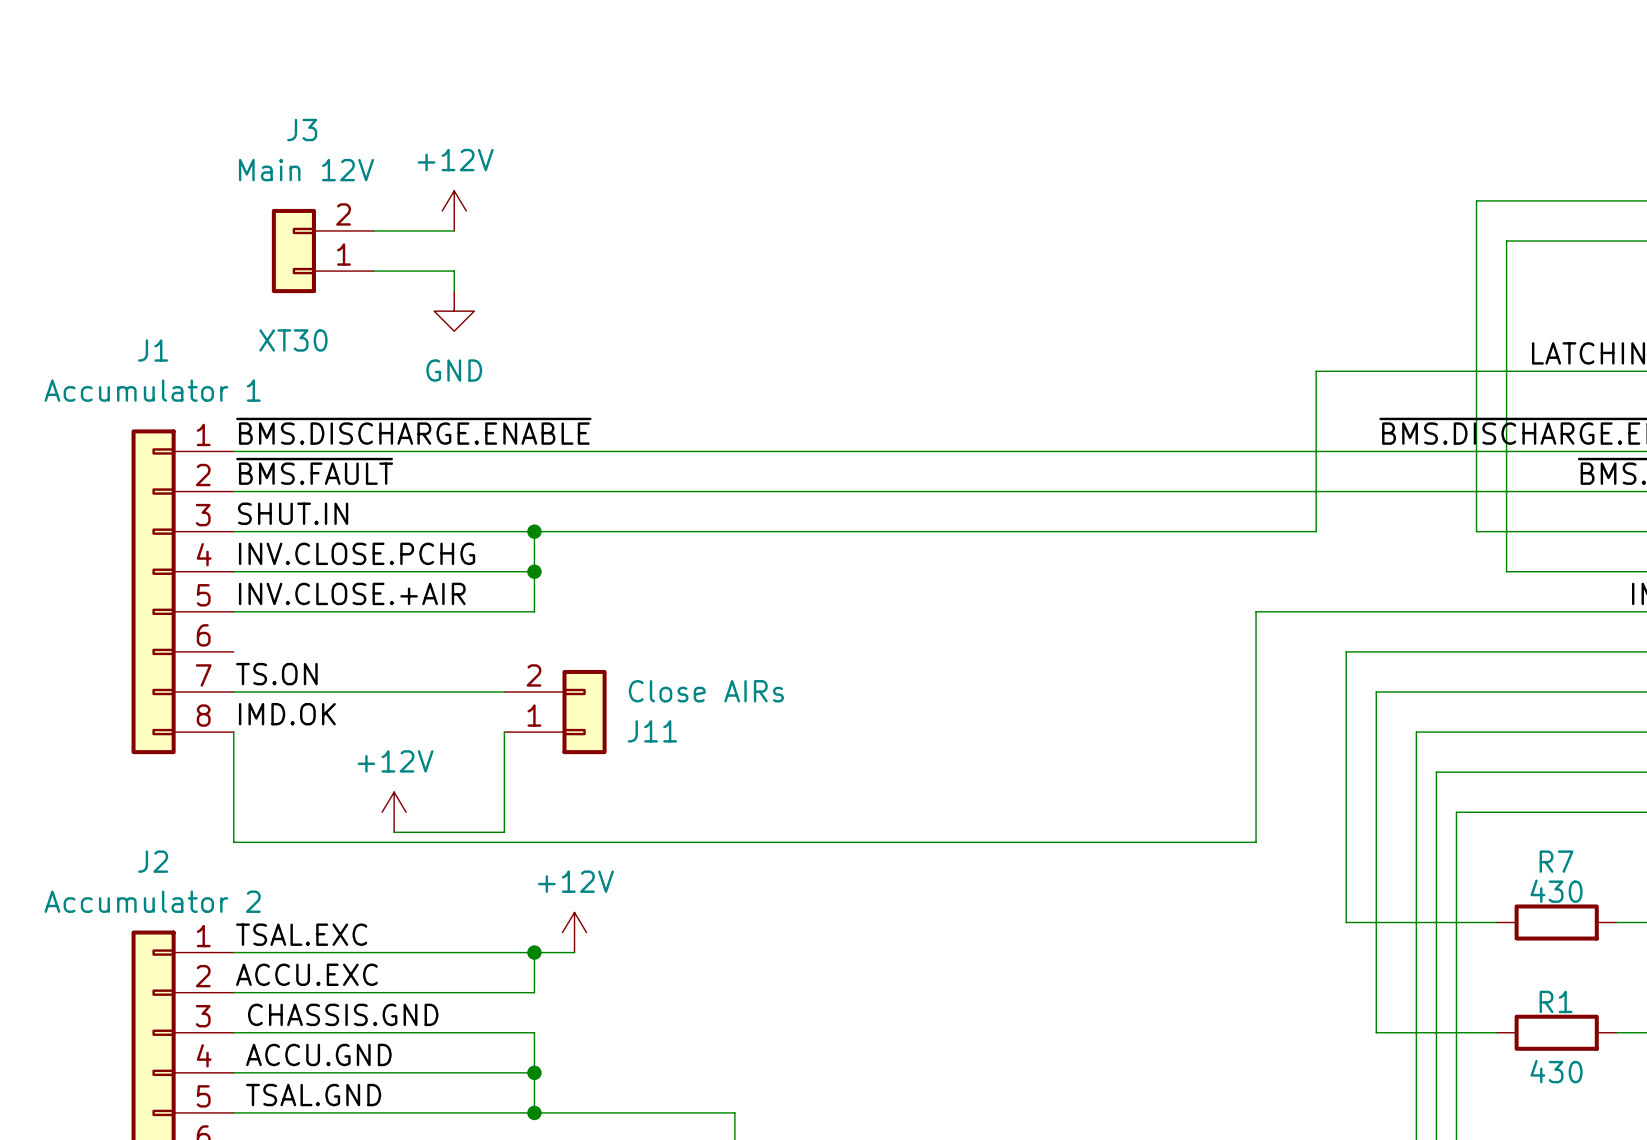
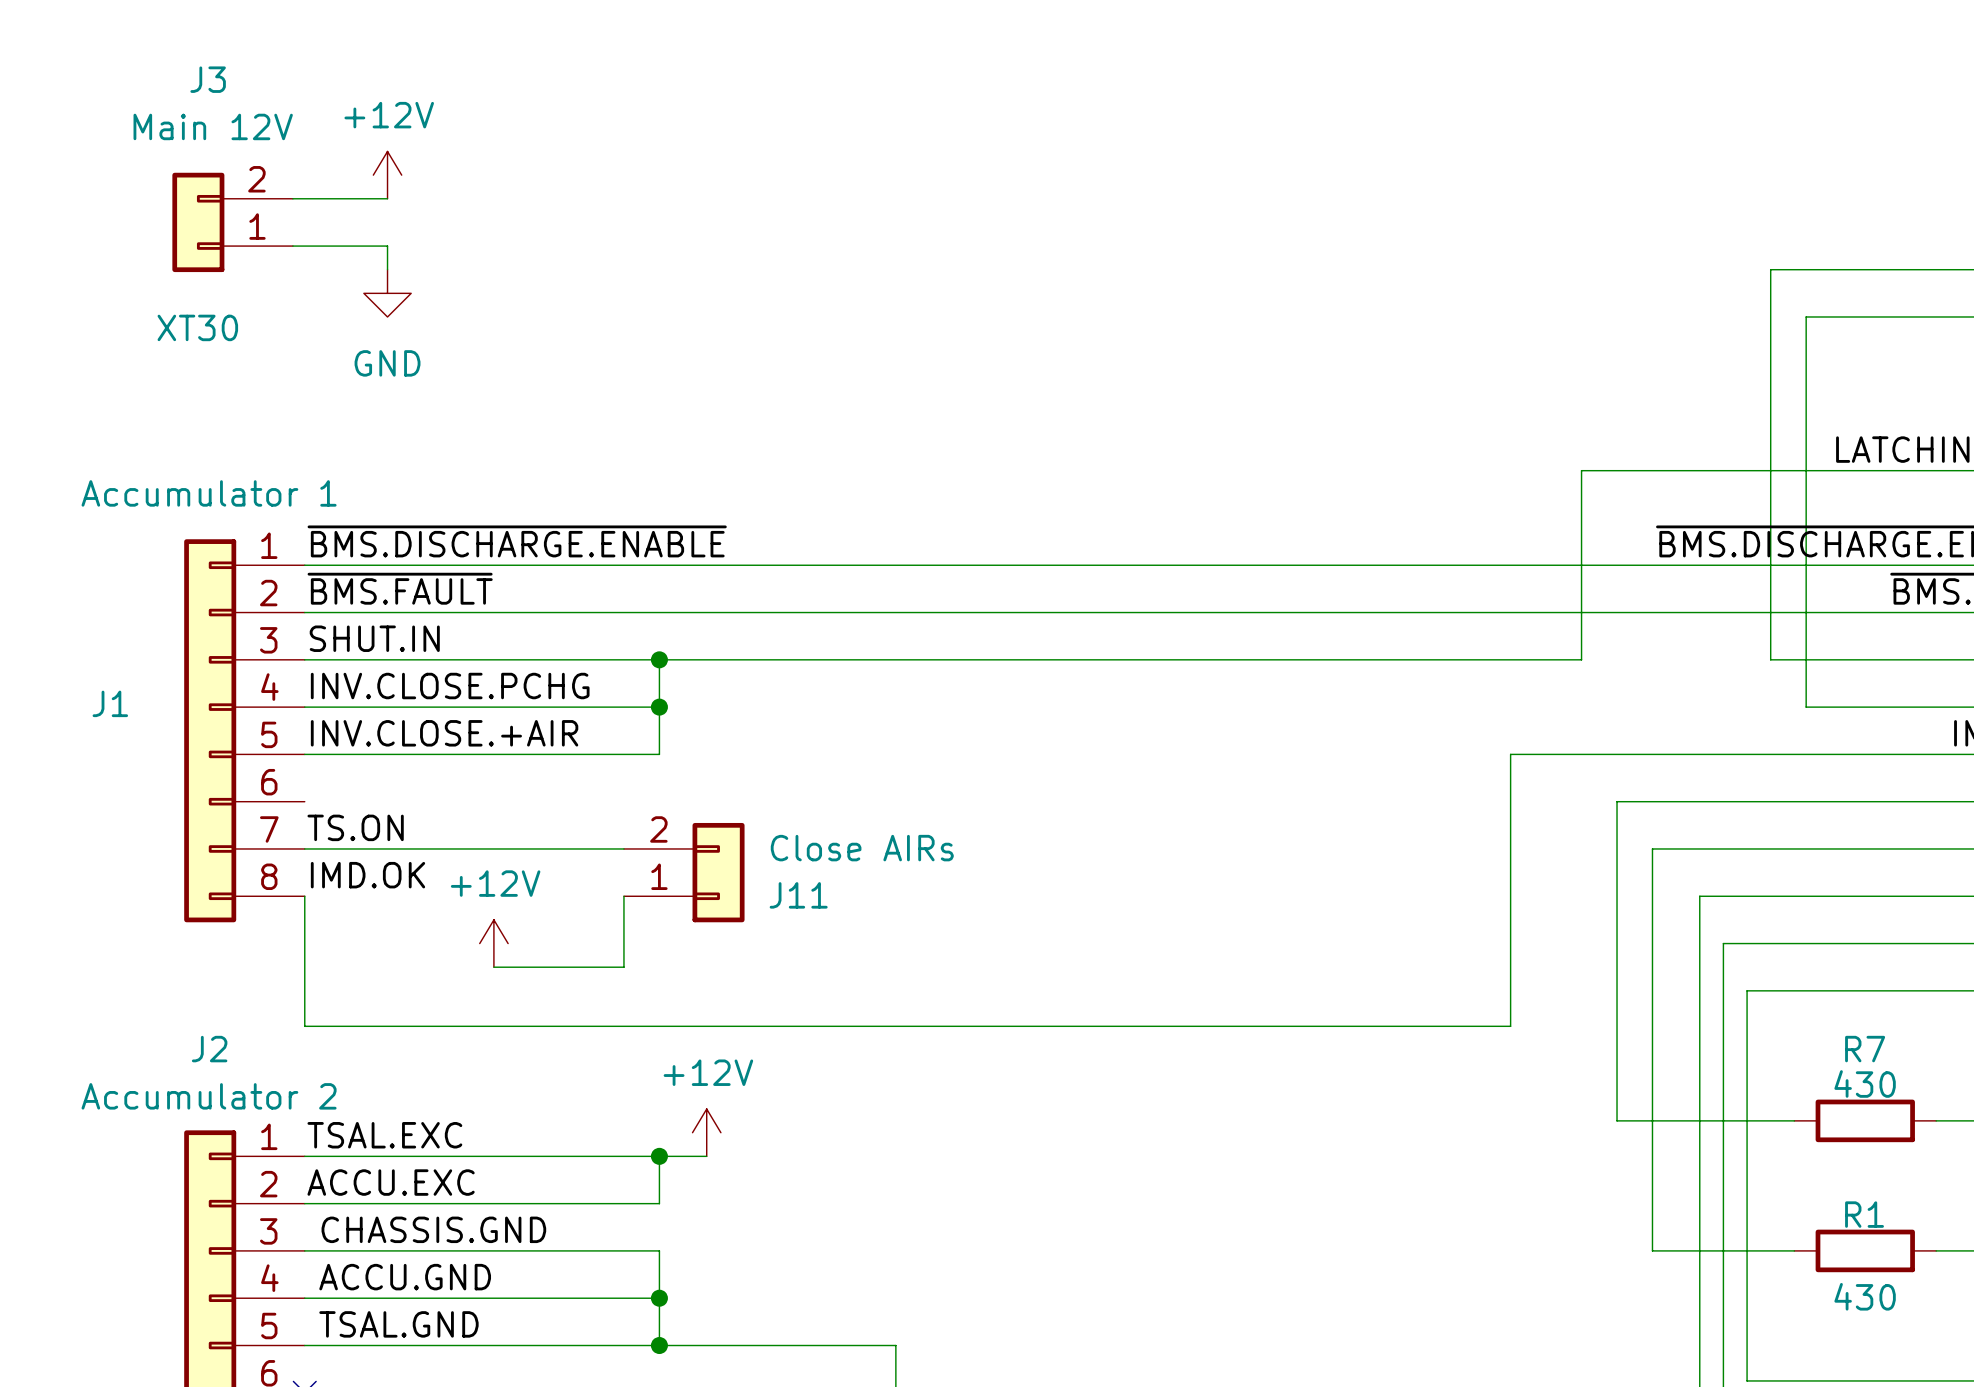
power symbol position: +12V (454, 210) -> +12V (387, 175)
wire: (374, 230) (454, 230) -> (292, 198) (387, 198)
J3 position: (322, 251) -> (232, 222)
wire: (374, 271) (454, 271) (454, 291) -> (292, 246) (387, 246) (387, 269)
power symbol position: GND (454, 311) -> GND (387, 293)
J1 name position: J1 (153, 350) -> J1 (110, 703)
wire: (504, 792) (504, 832) (394, 832) -> (623, 967) (493, 967)
power symbol position: +12V (394, 812) -> +12V (493, 943)

